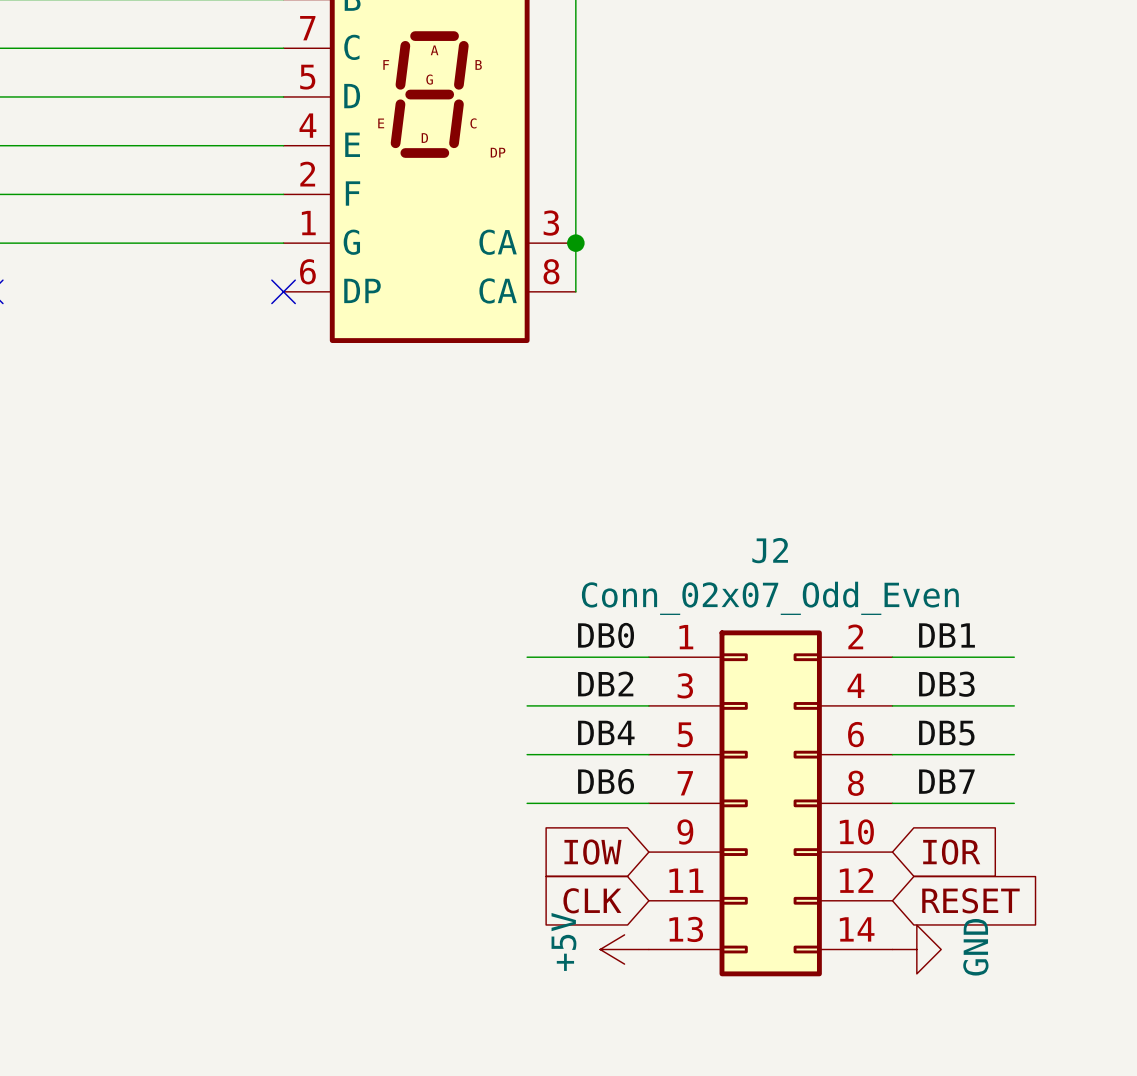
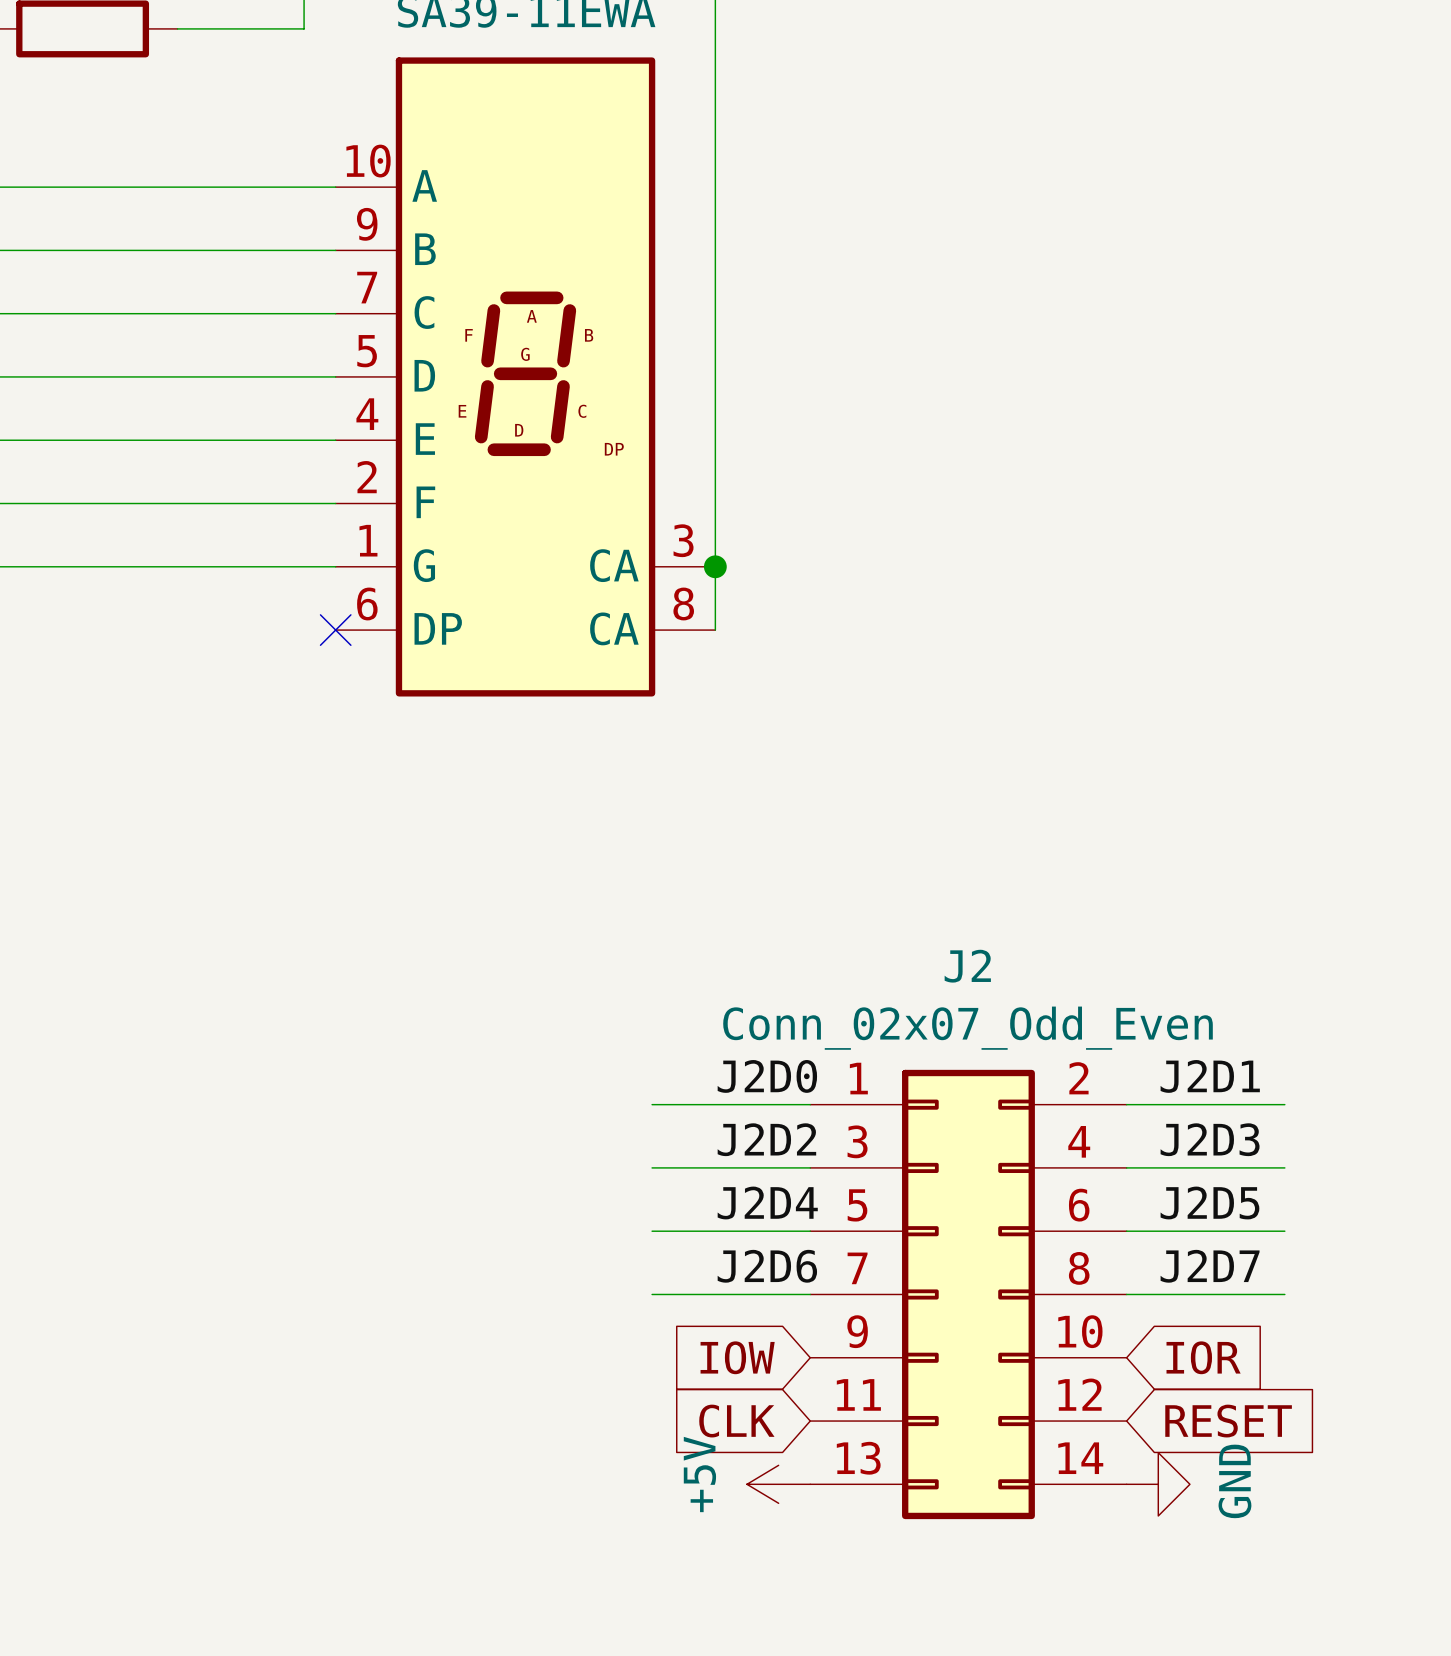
label: DB0 (606, 635) -> J2D0 (767, 1076)
label: DB1 (947, 635) -> J2D1 (1210, 1076)
label: DB2 (605, 683) -> J2D2 (766, 1139)
label: DB3 (946, 684) -> J2D3 (1210, 1139)
label: DB4 (606, 732) -> J2D4 (767, 1202)
label: DB5 (946, 733) -> J2D5 (1209, 1202)
label: DB6 (606, 781) -> J2D6 (767, 1266)
label: DB7 (946, 781) -> J2D7 (1210, 1266)

